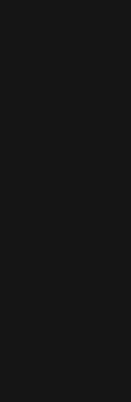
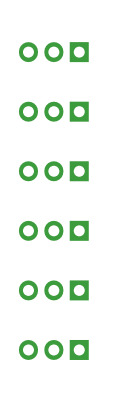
part: none -> (53, 52)
part: none -> (53, 111)
part: none -> (53, 171)
part: none -> (53, 230)
part: none -> (53, 290)
part: none -> (53, 349)

